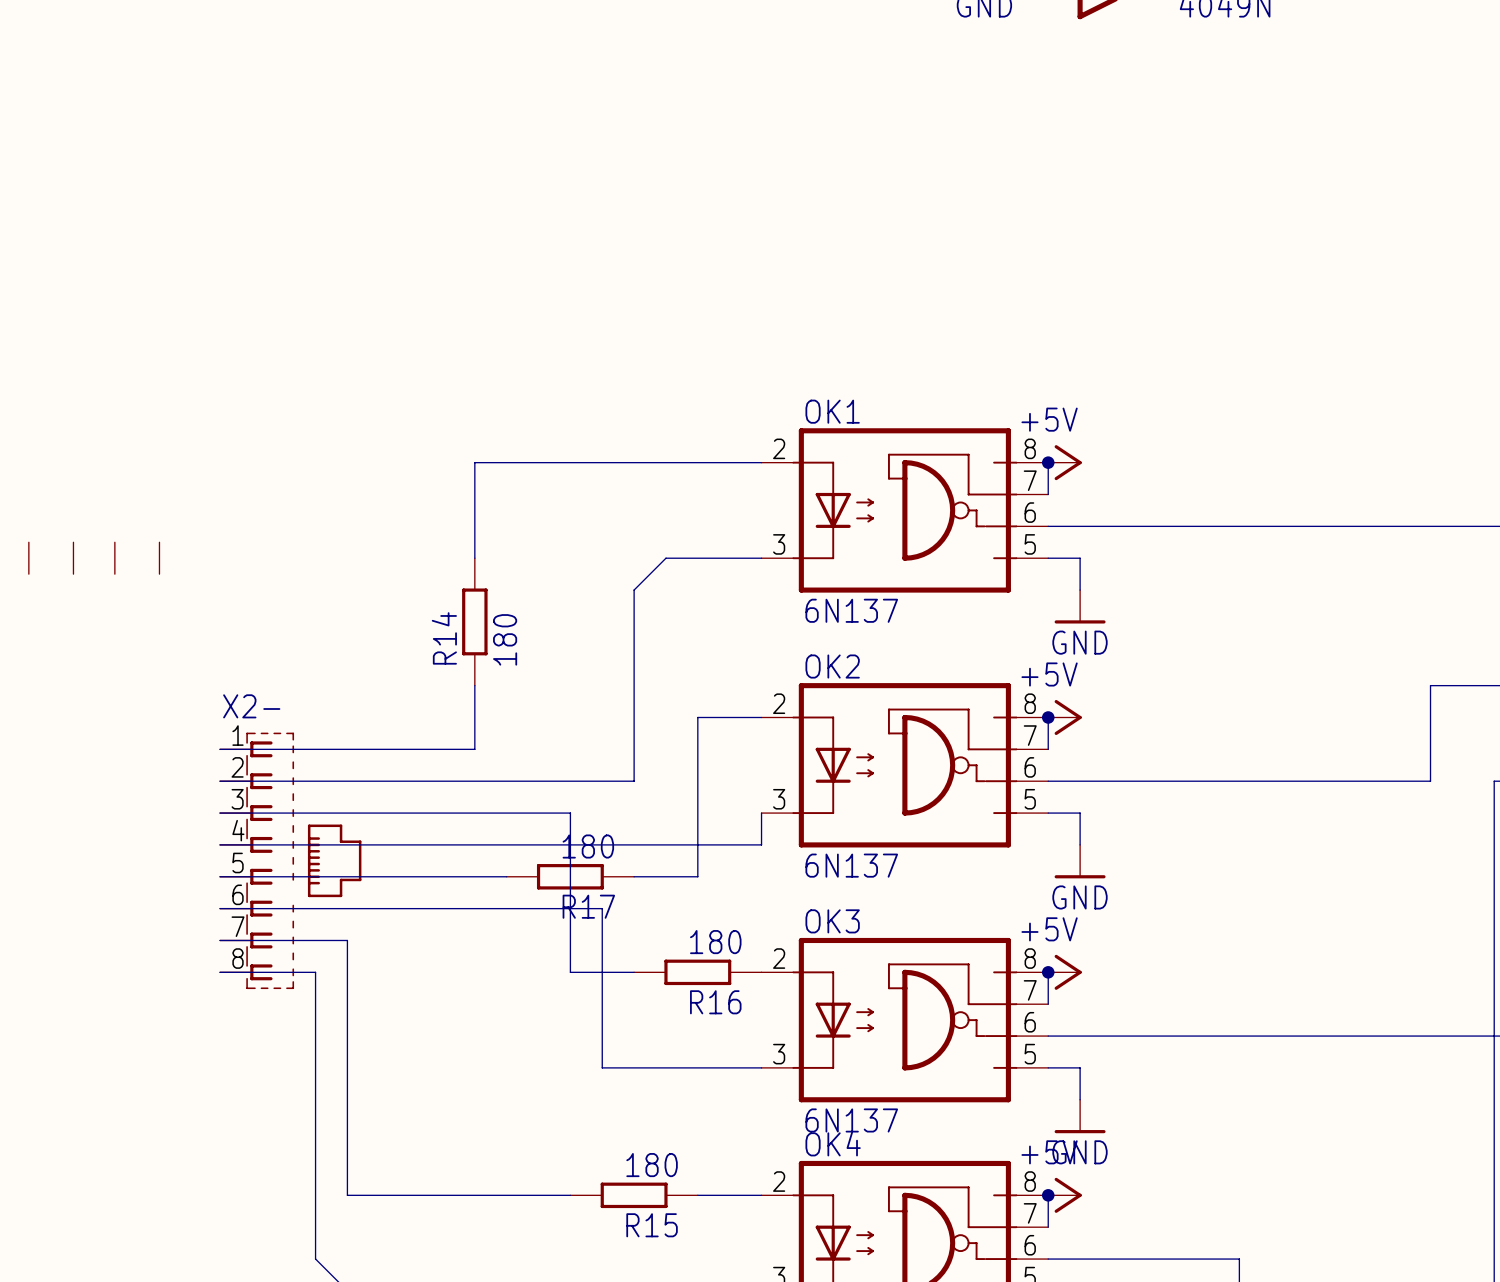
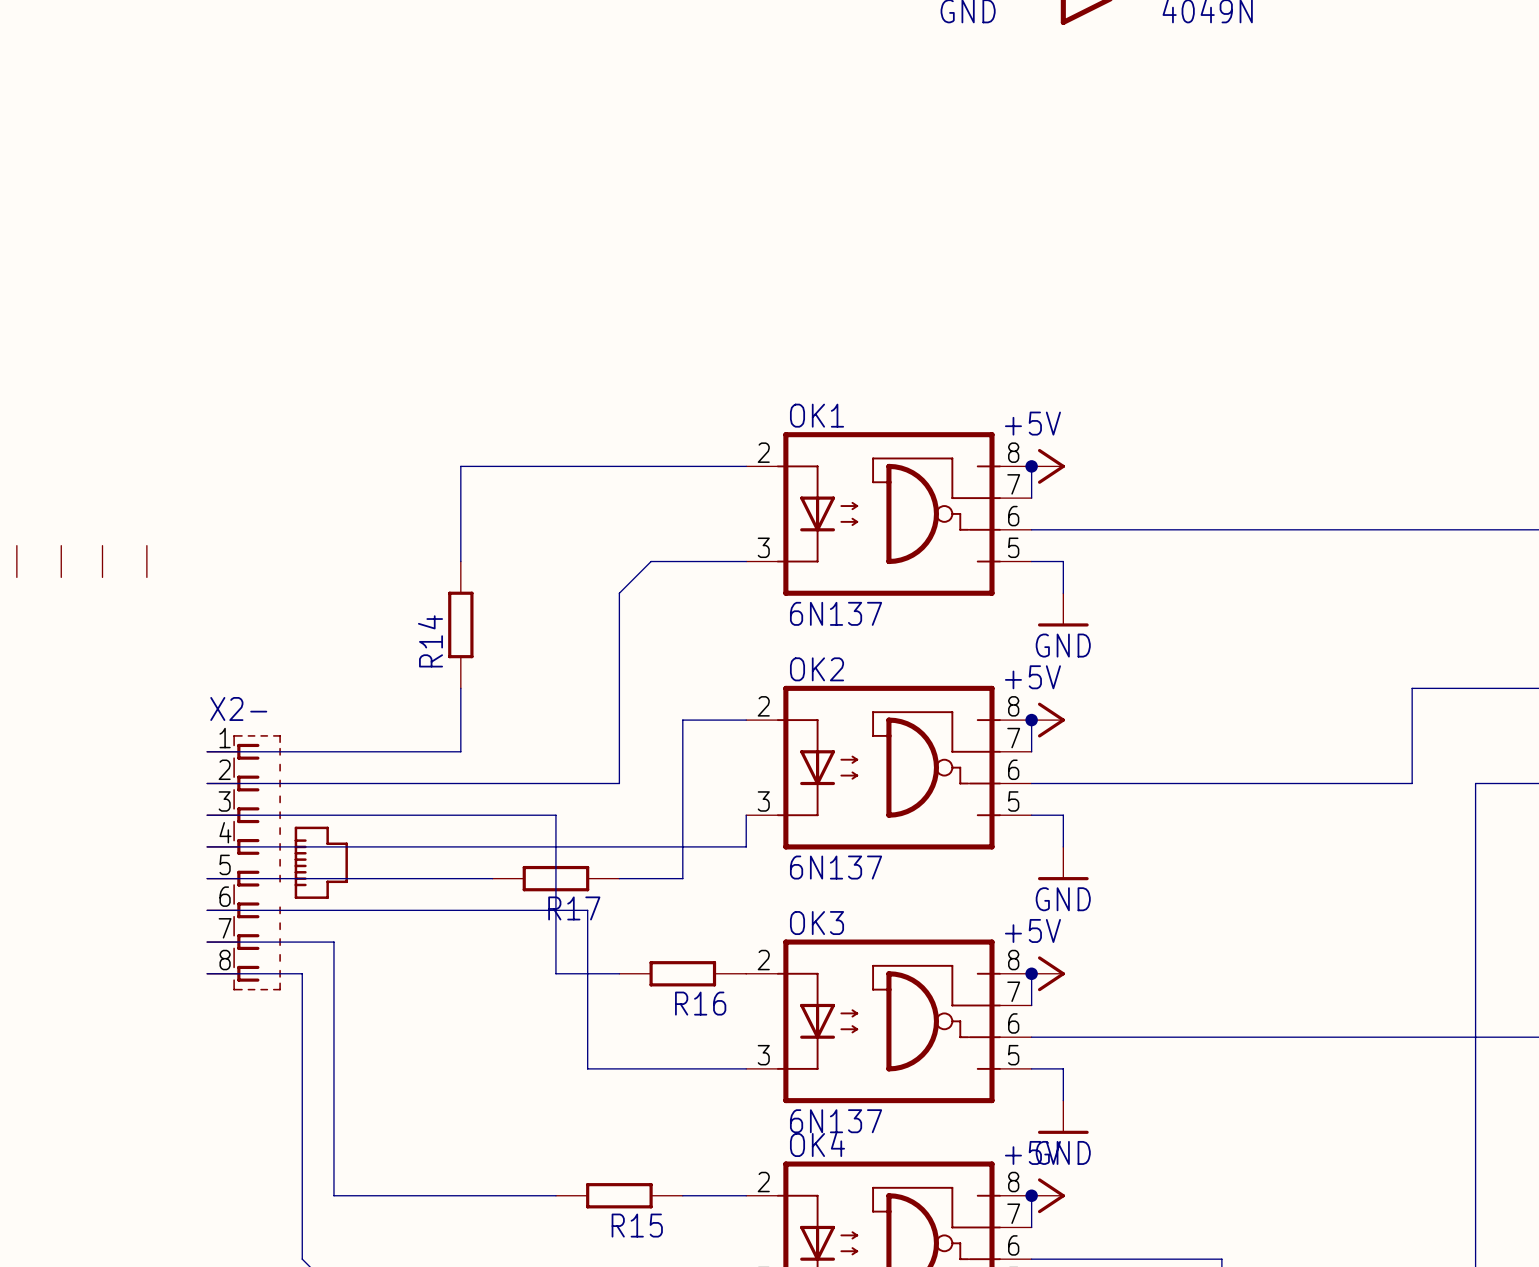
R14 value: 180 (505, 639) -> none
R17 value: 180 (588, 846) -> none
R16 value: 180 (715, 942) -> none
R15 value: 180 (652, 1165) -> none

